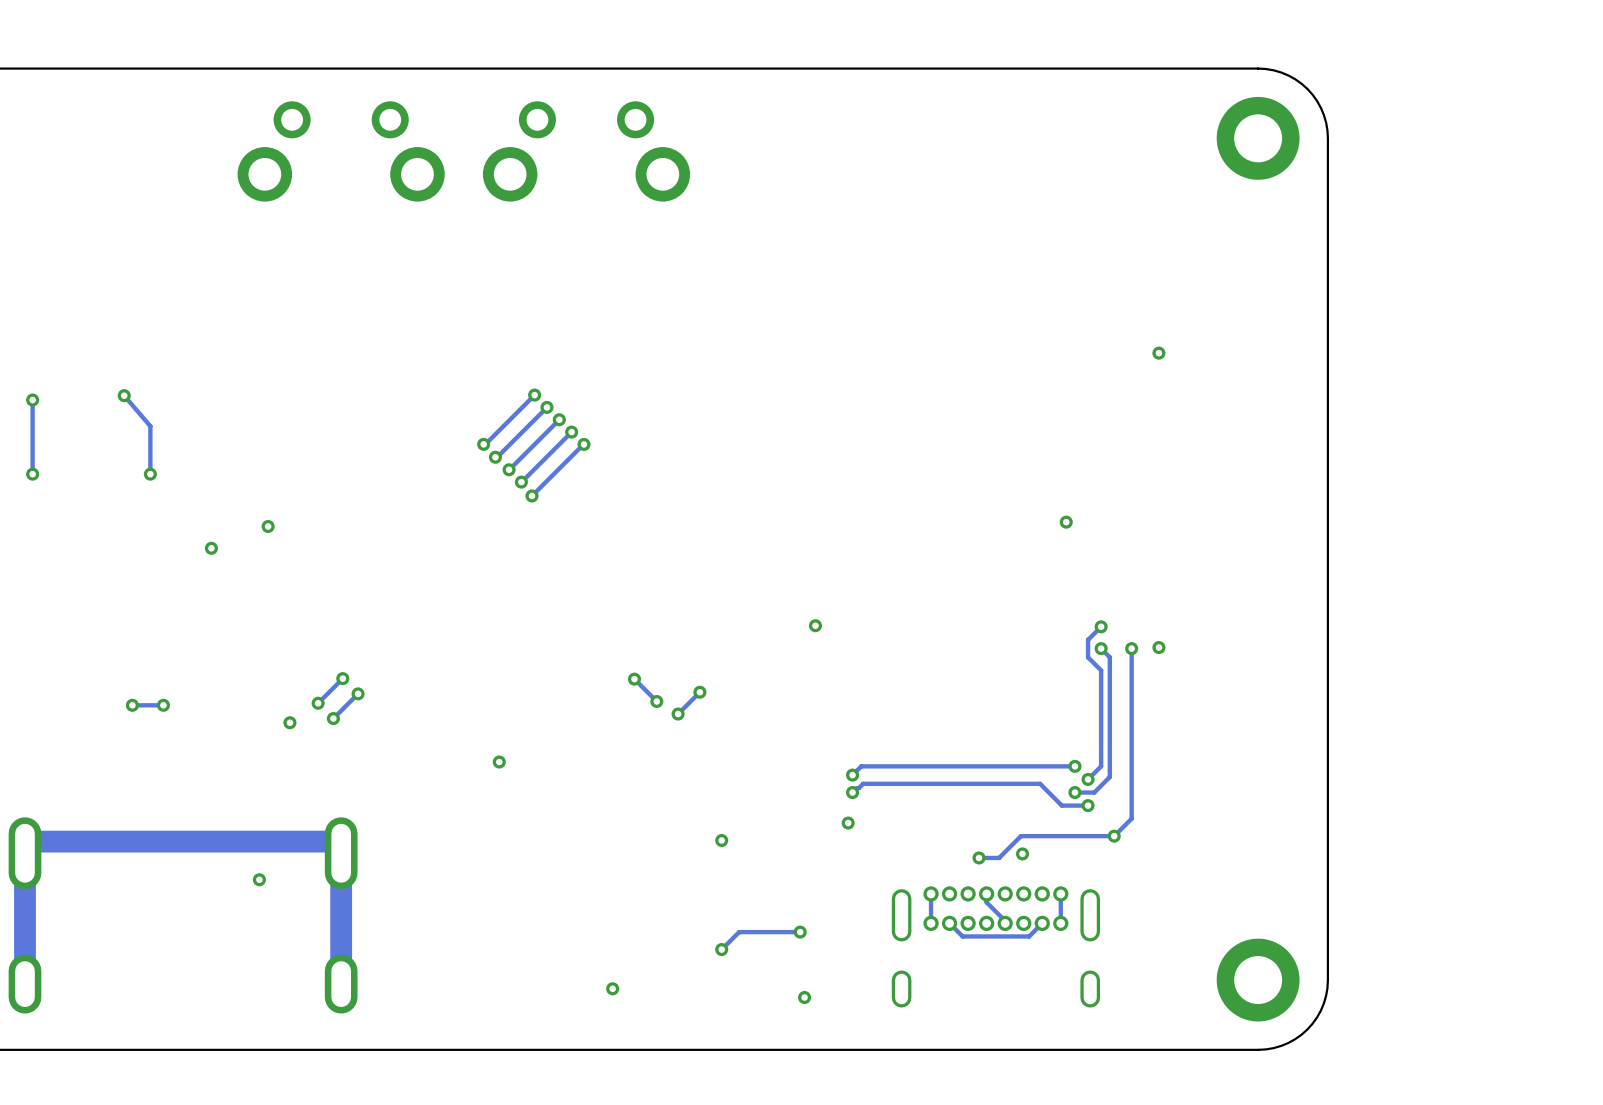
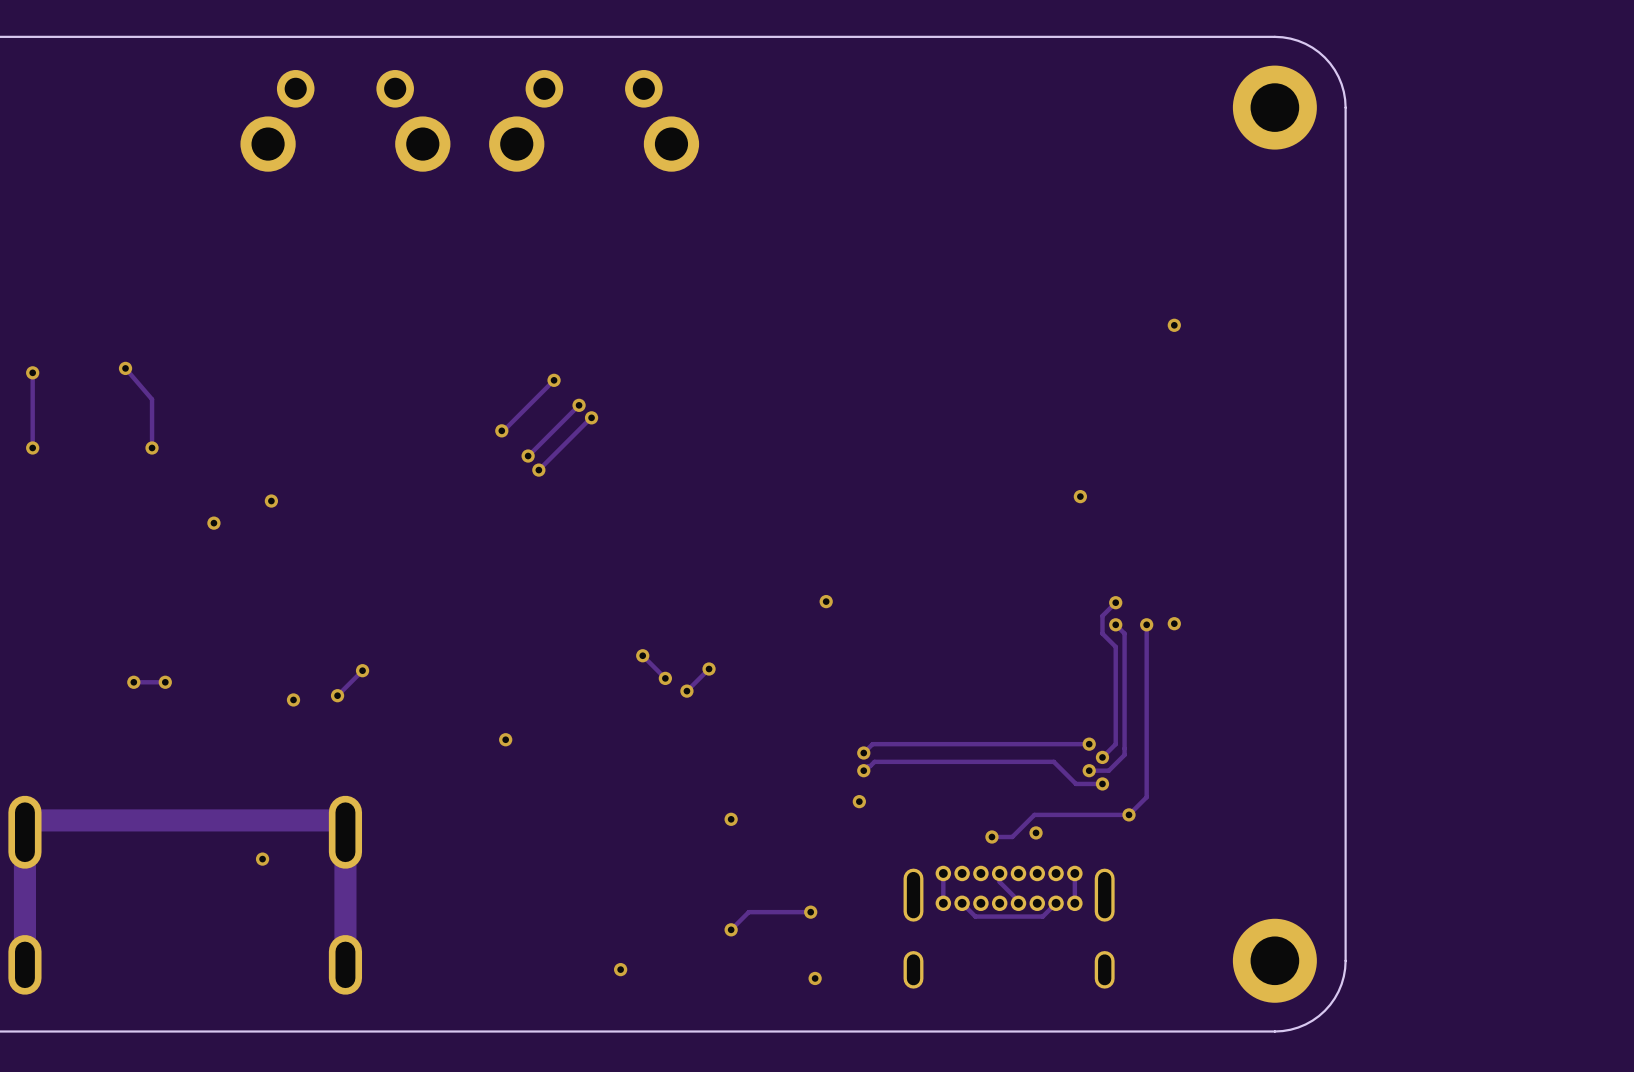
track: (534, 395) (483, 444) -> none
via: (534, 395) -> none
track: (559, 419) (509, 469) -> none
via: (559, 419) -> none
via: (483, 444) -> none
via: (509, 469) -> none
track: (342, 678) (318, 703) -> none
via: (342, 678) -> none
via: (318, 703) -> none

